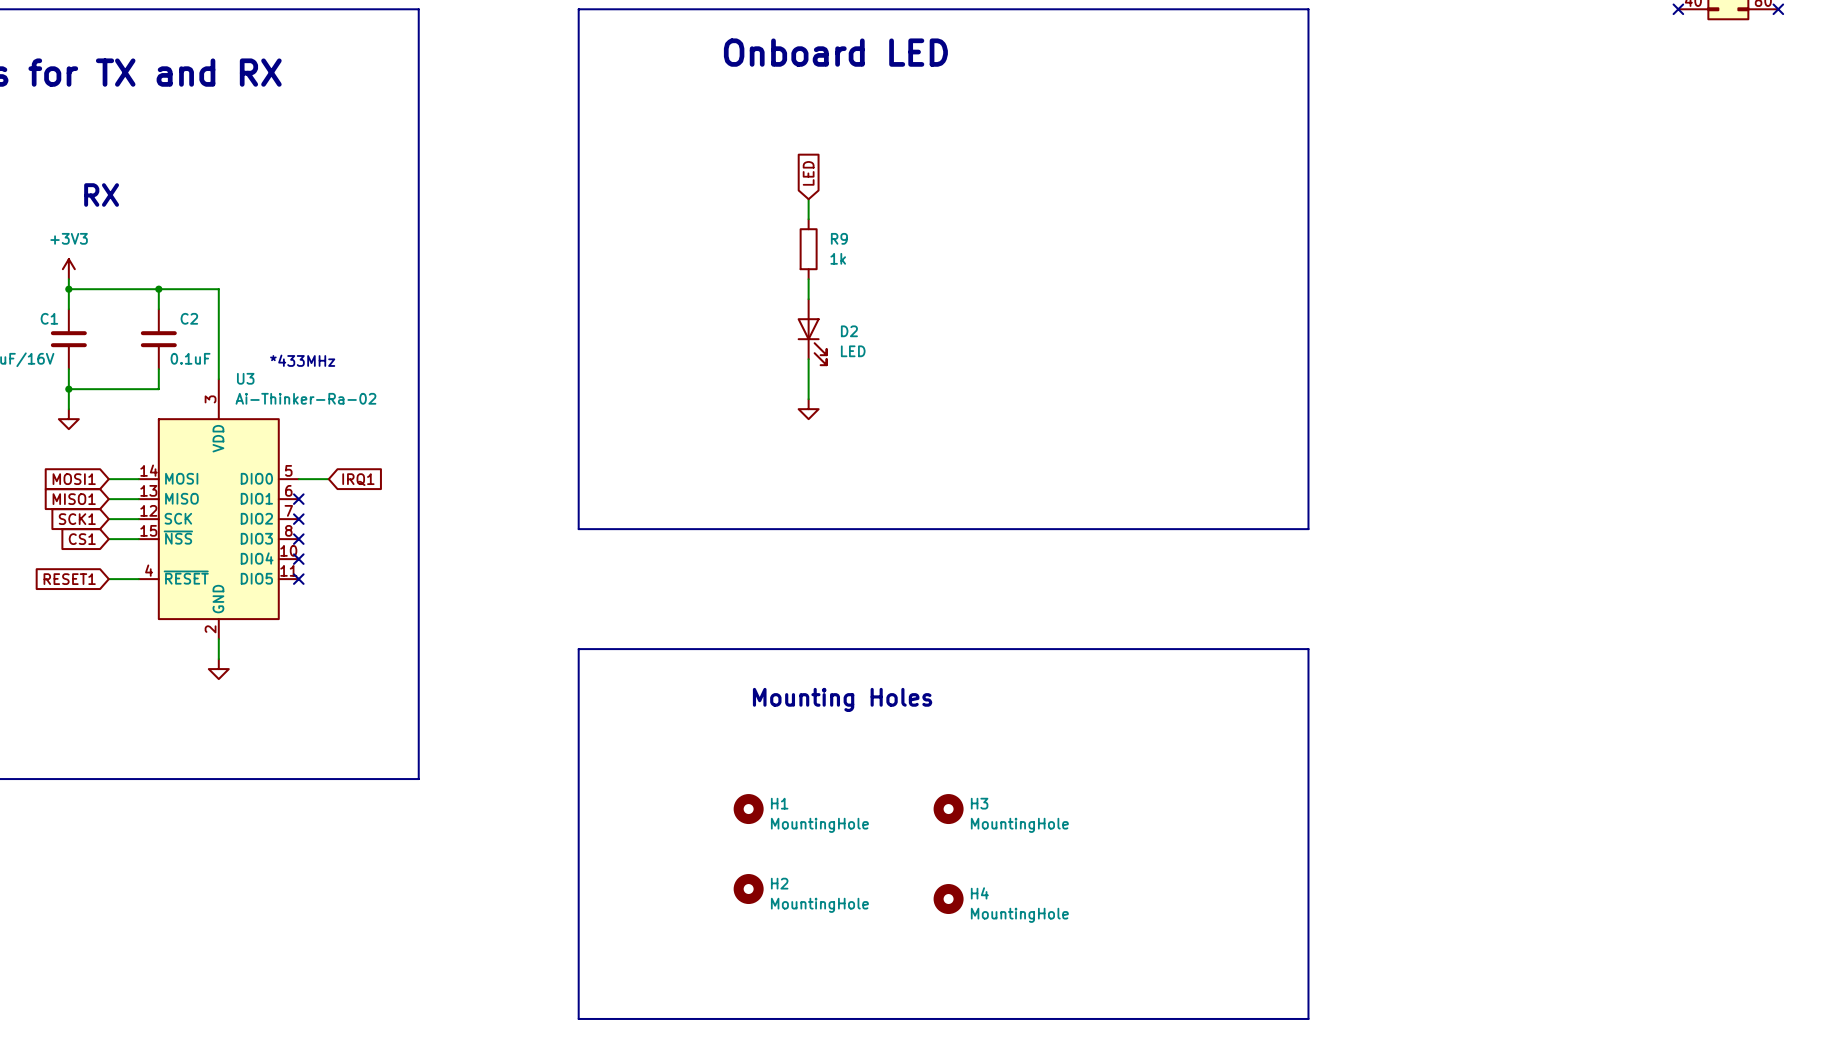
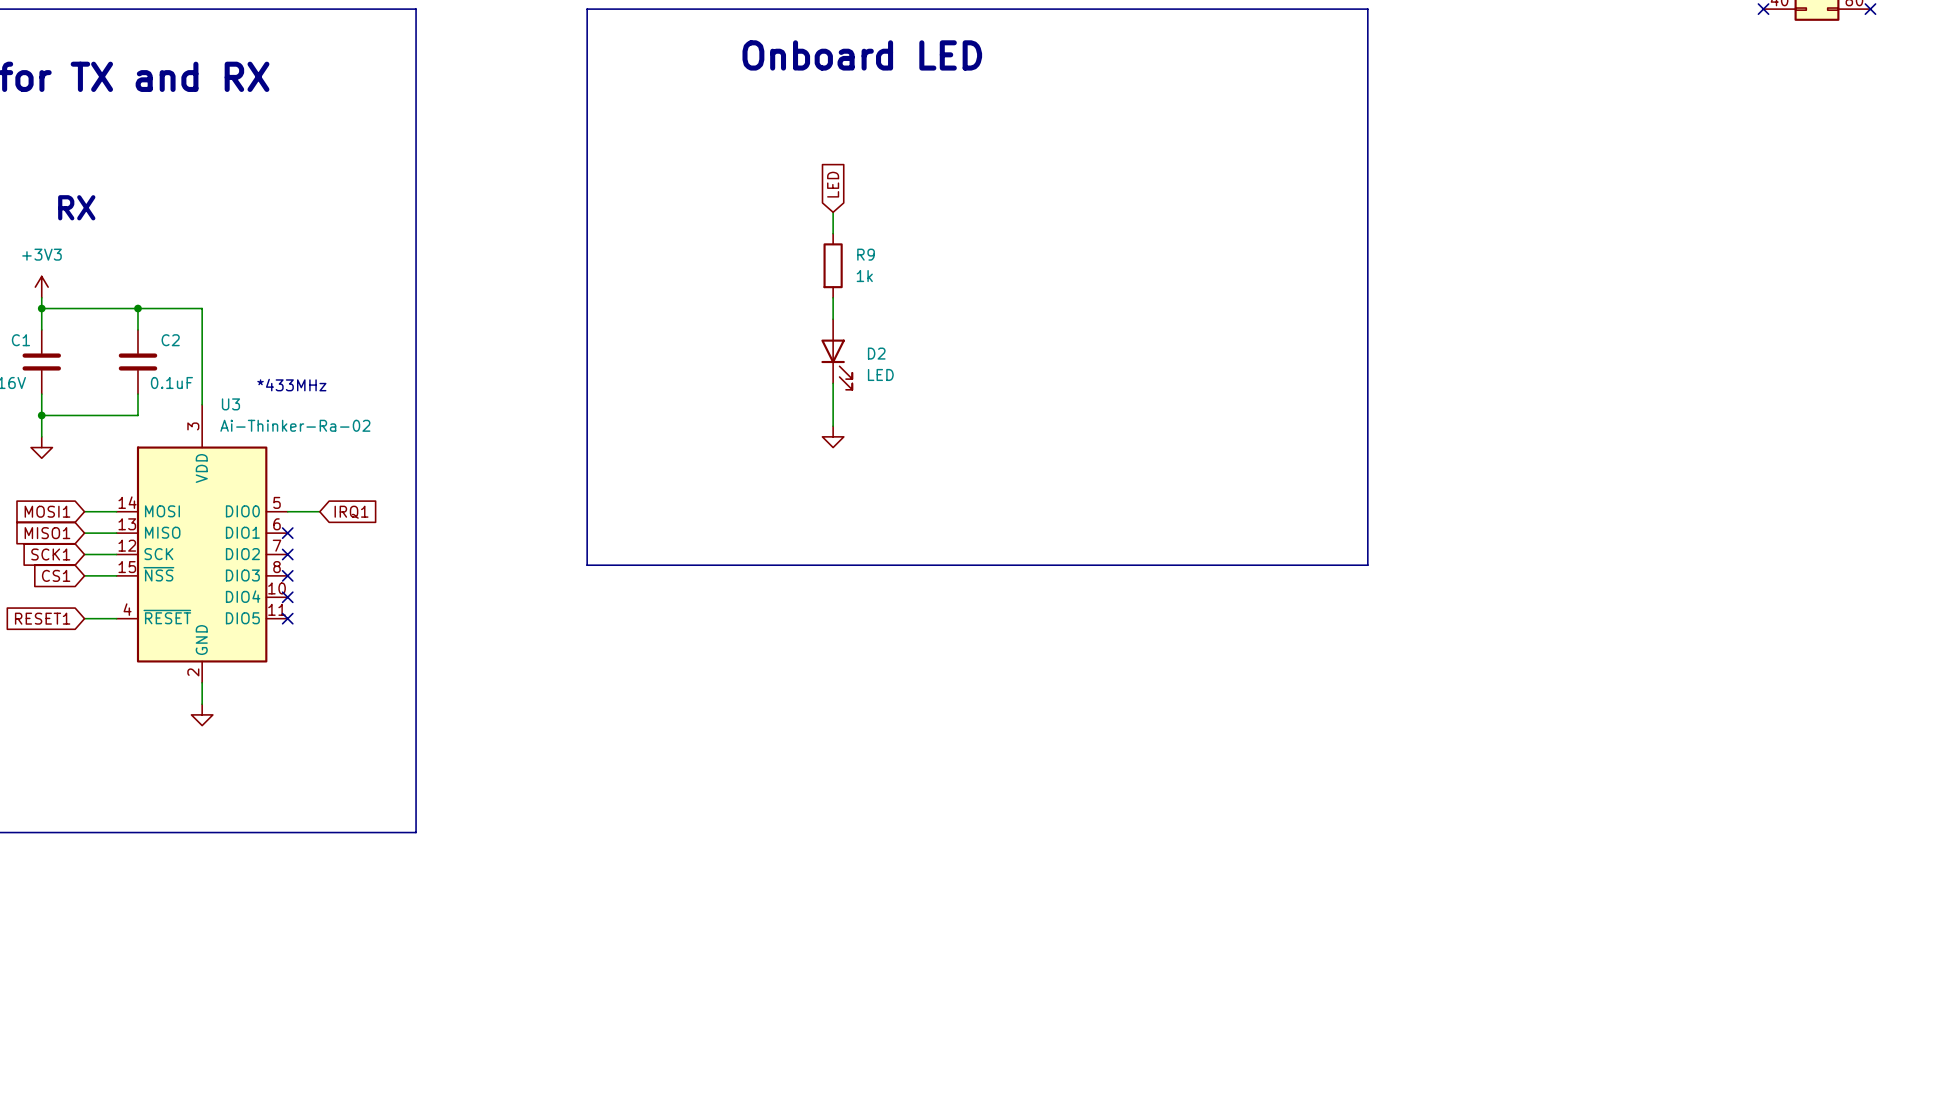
line: (578, 649) (1308, 649) (1308, 1018) (578, 1018) (578, 649) -> none
text: Mounting Holes (842, 699) -> none
H1: MountingHole (748, 809) -> none
H3: MountingHole (948, 809) -> none
H2: MountingHole (748, 889) -> none
H4: MountingHole (948, 899) -> none

